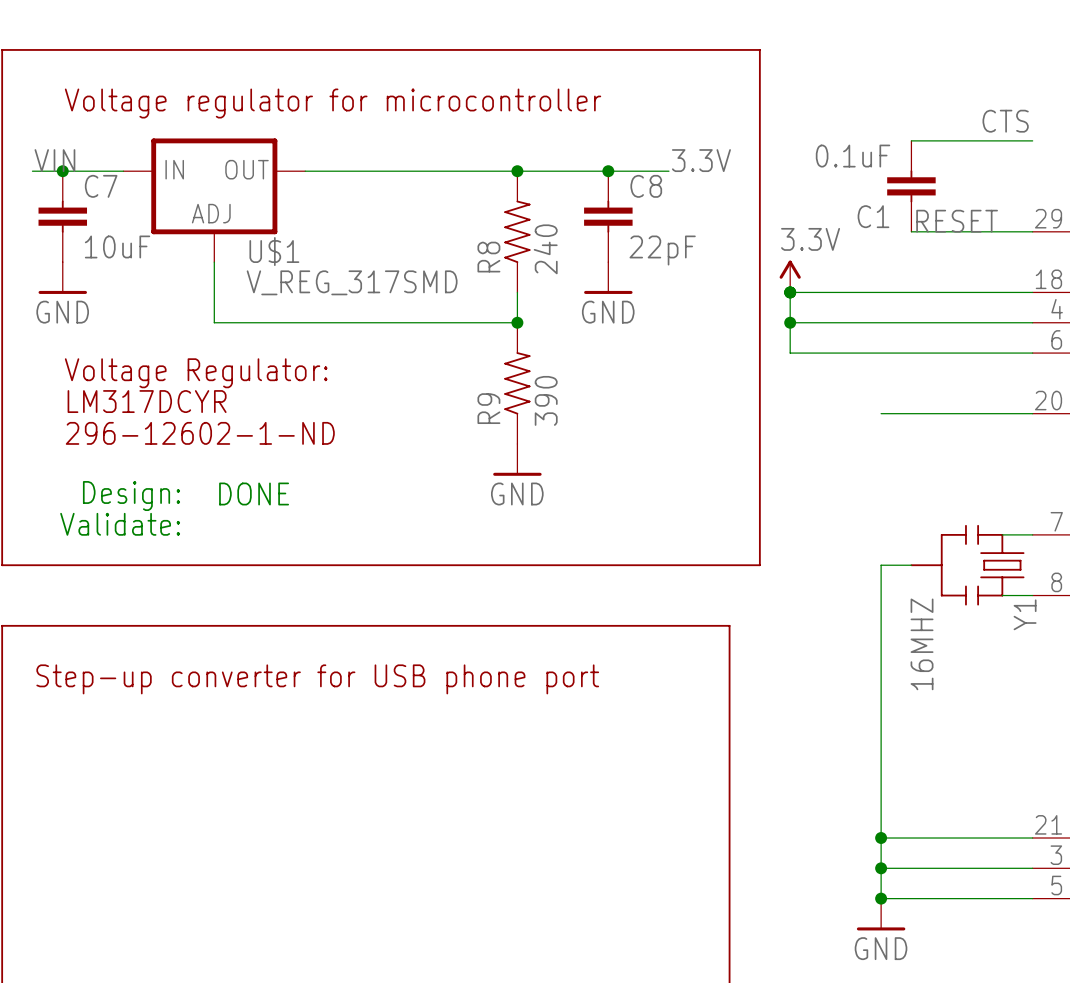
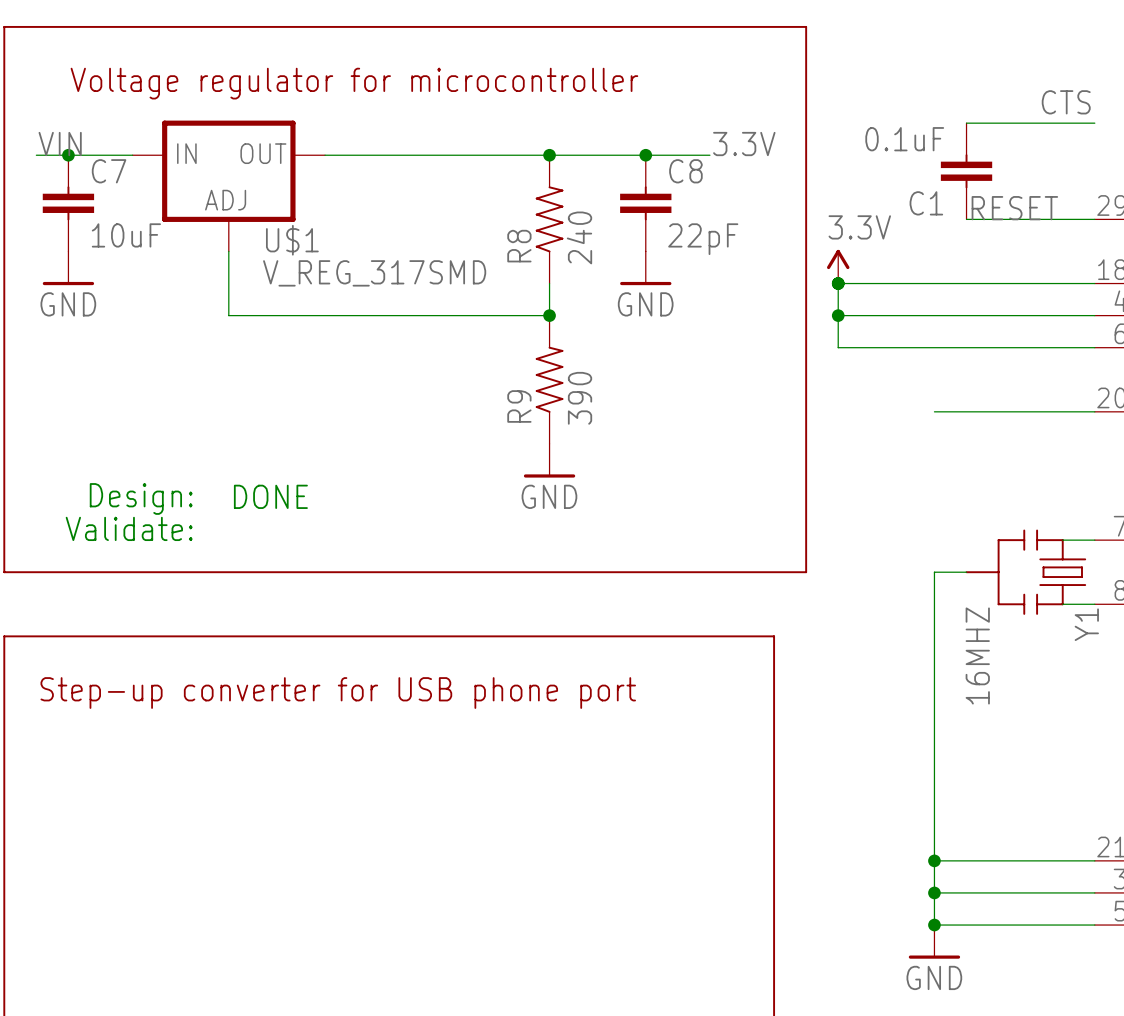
text: Voltage Regulator: (196, 373) -> none
text: LM317DCYR (147, 401) -> none
text: 296-12602-1-ND (200, 433) -> none

